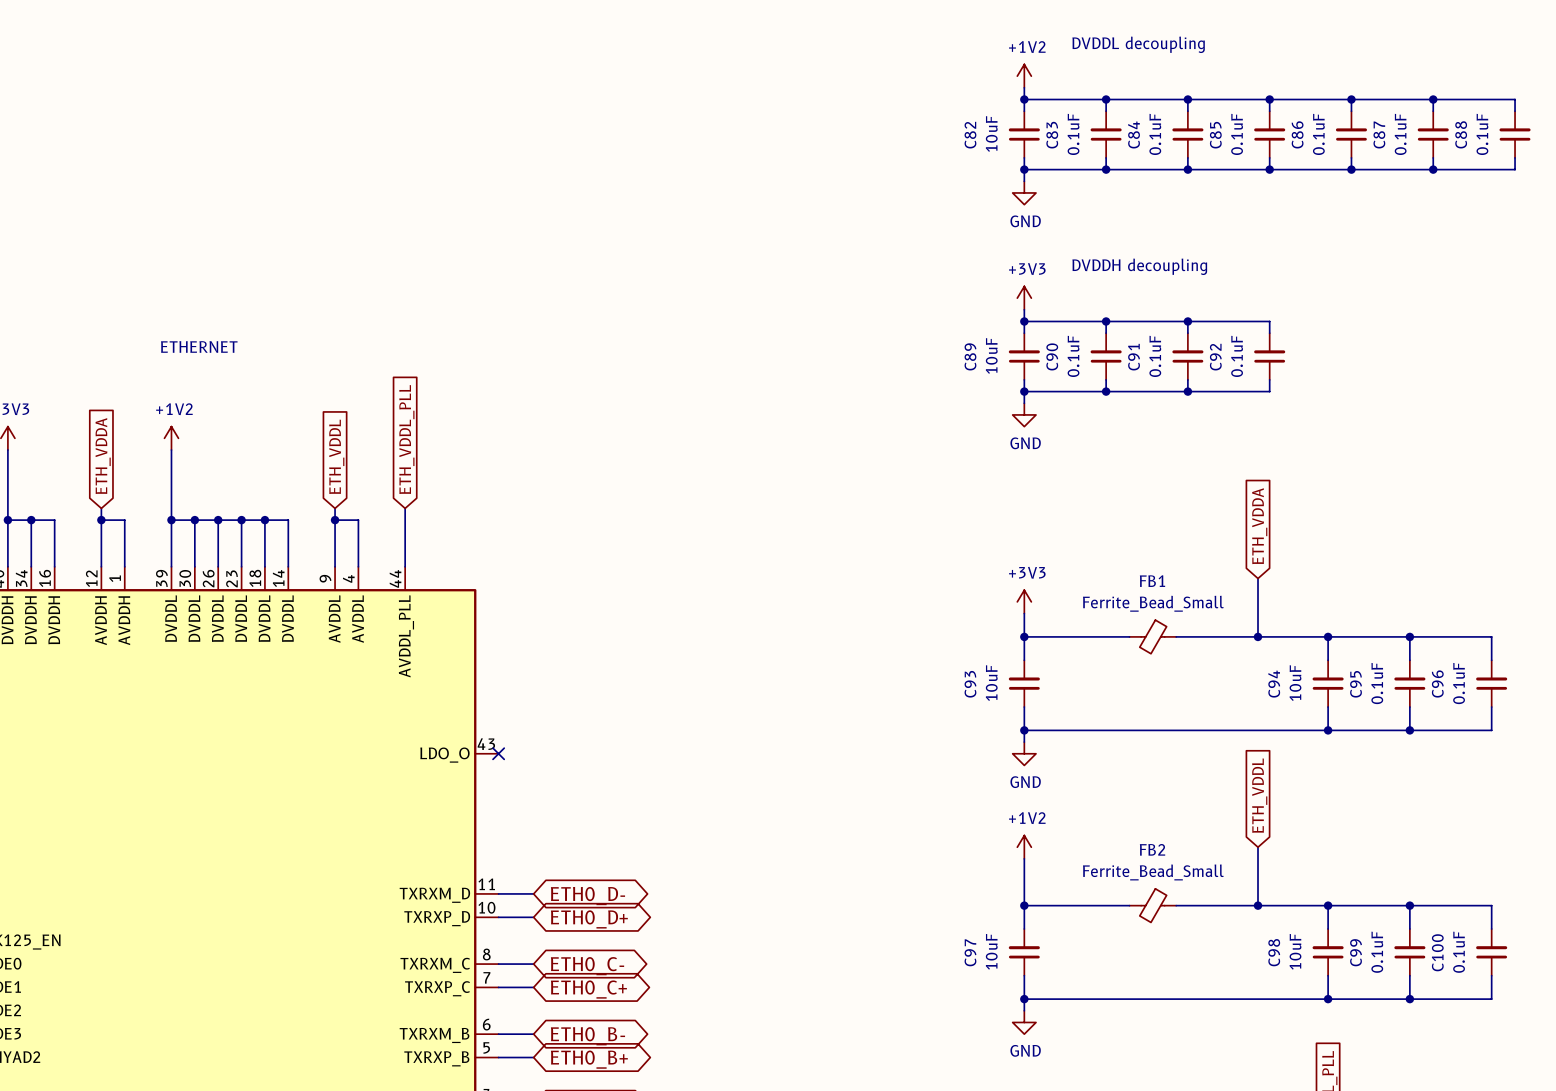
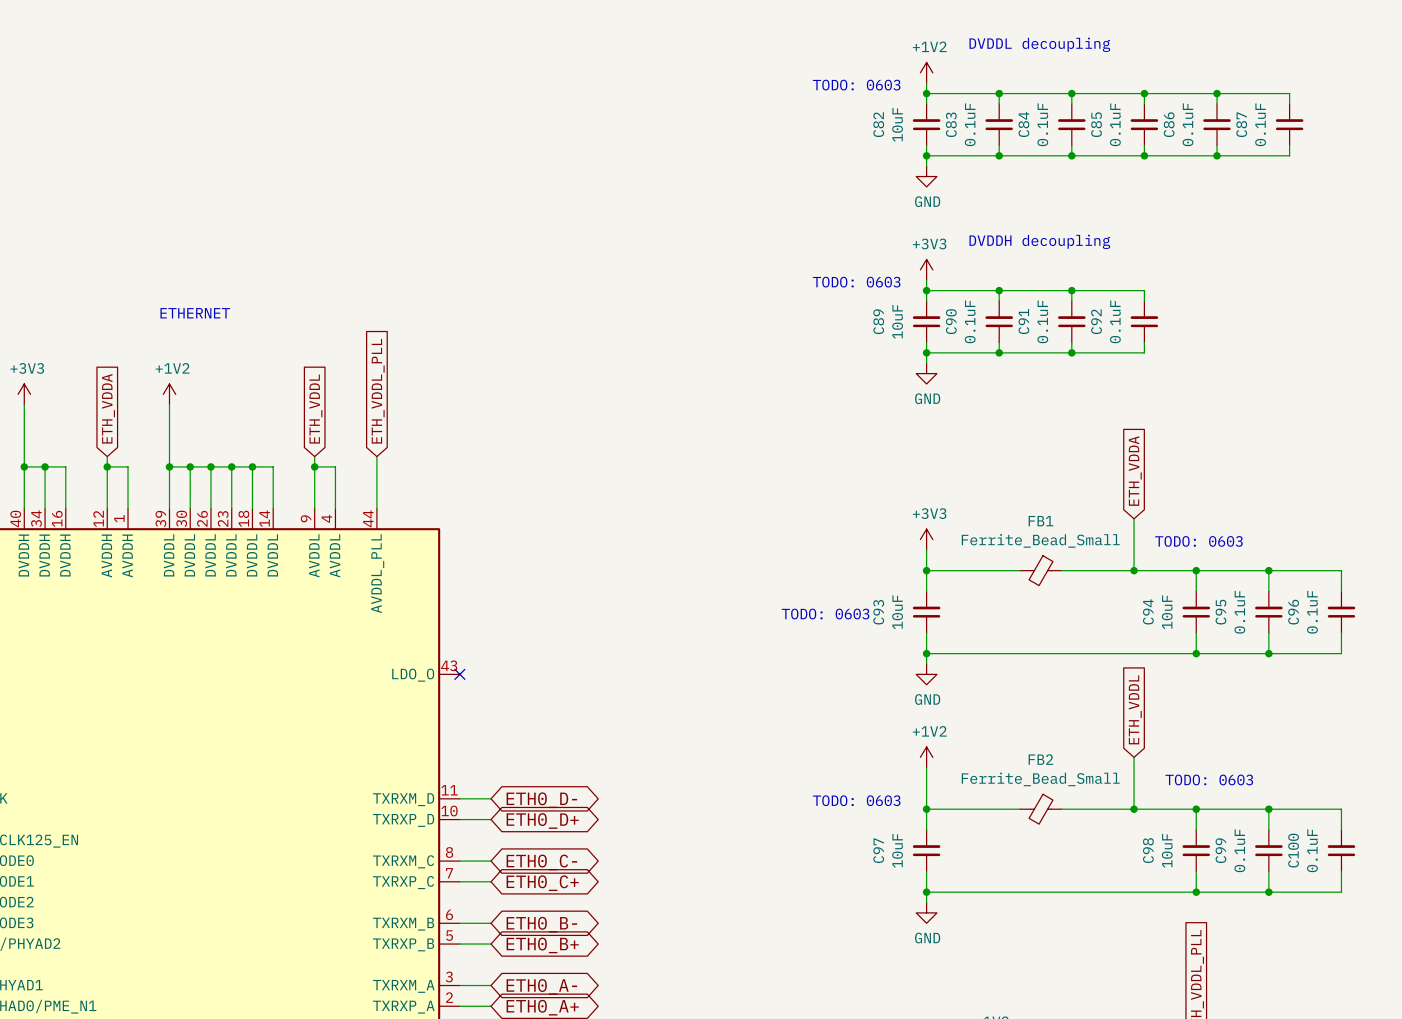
text: none -> TODO: 0603 (856, 85)
wire: (1433, 99) (1515, 99) (1515, 111) -> none
junction: (1433, 99) -> none
C88: 0.1uF (1515, 134) -> none
wire: (1515, 157) (1515, 169) (1433, 169) -> none
junction: (1433, 169) -> none
text: none -> TODO: 0603 (856, 282)
text: none -> TODO: 0603 (1198, 541)
text: none -> TODO: 0603 (825, 614)
text: none -> TODO: 0603 (1209, 779)
text: none -> TODO: 0603 (856, 800)

